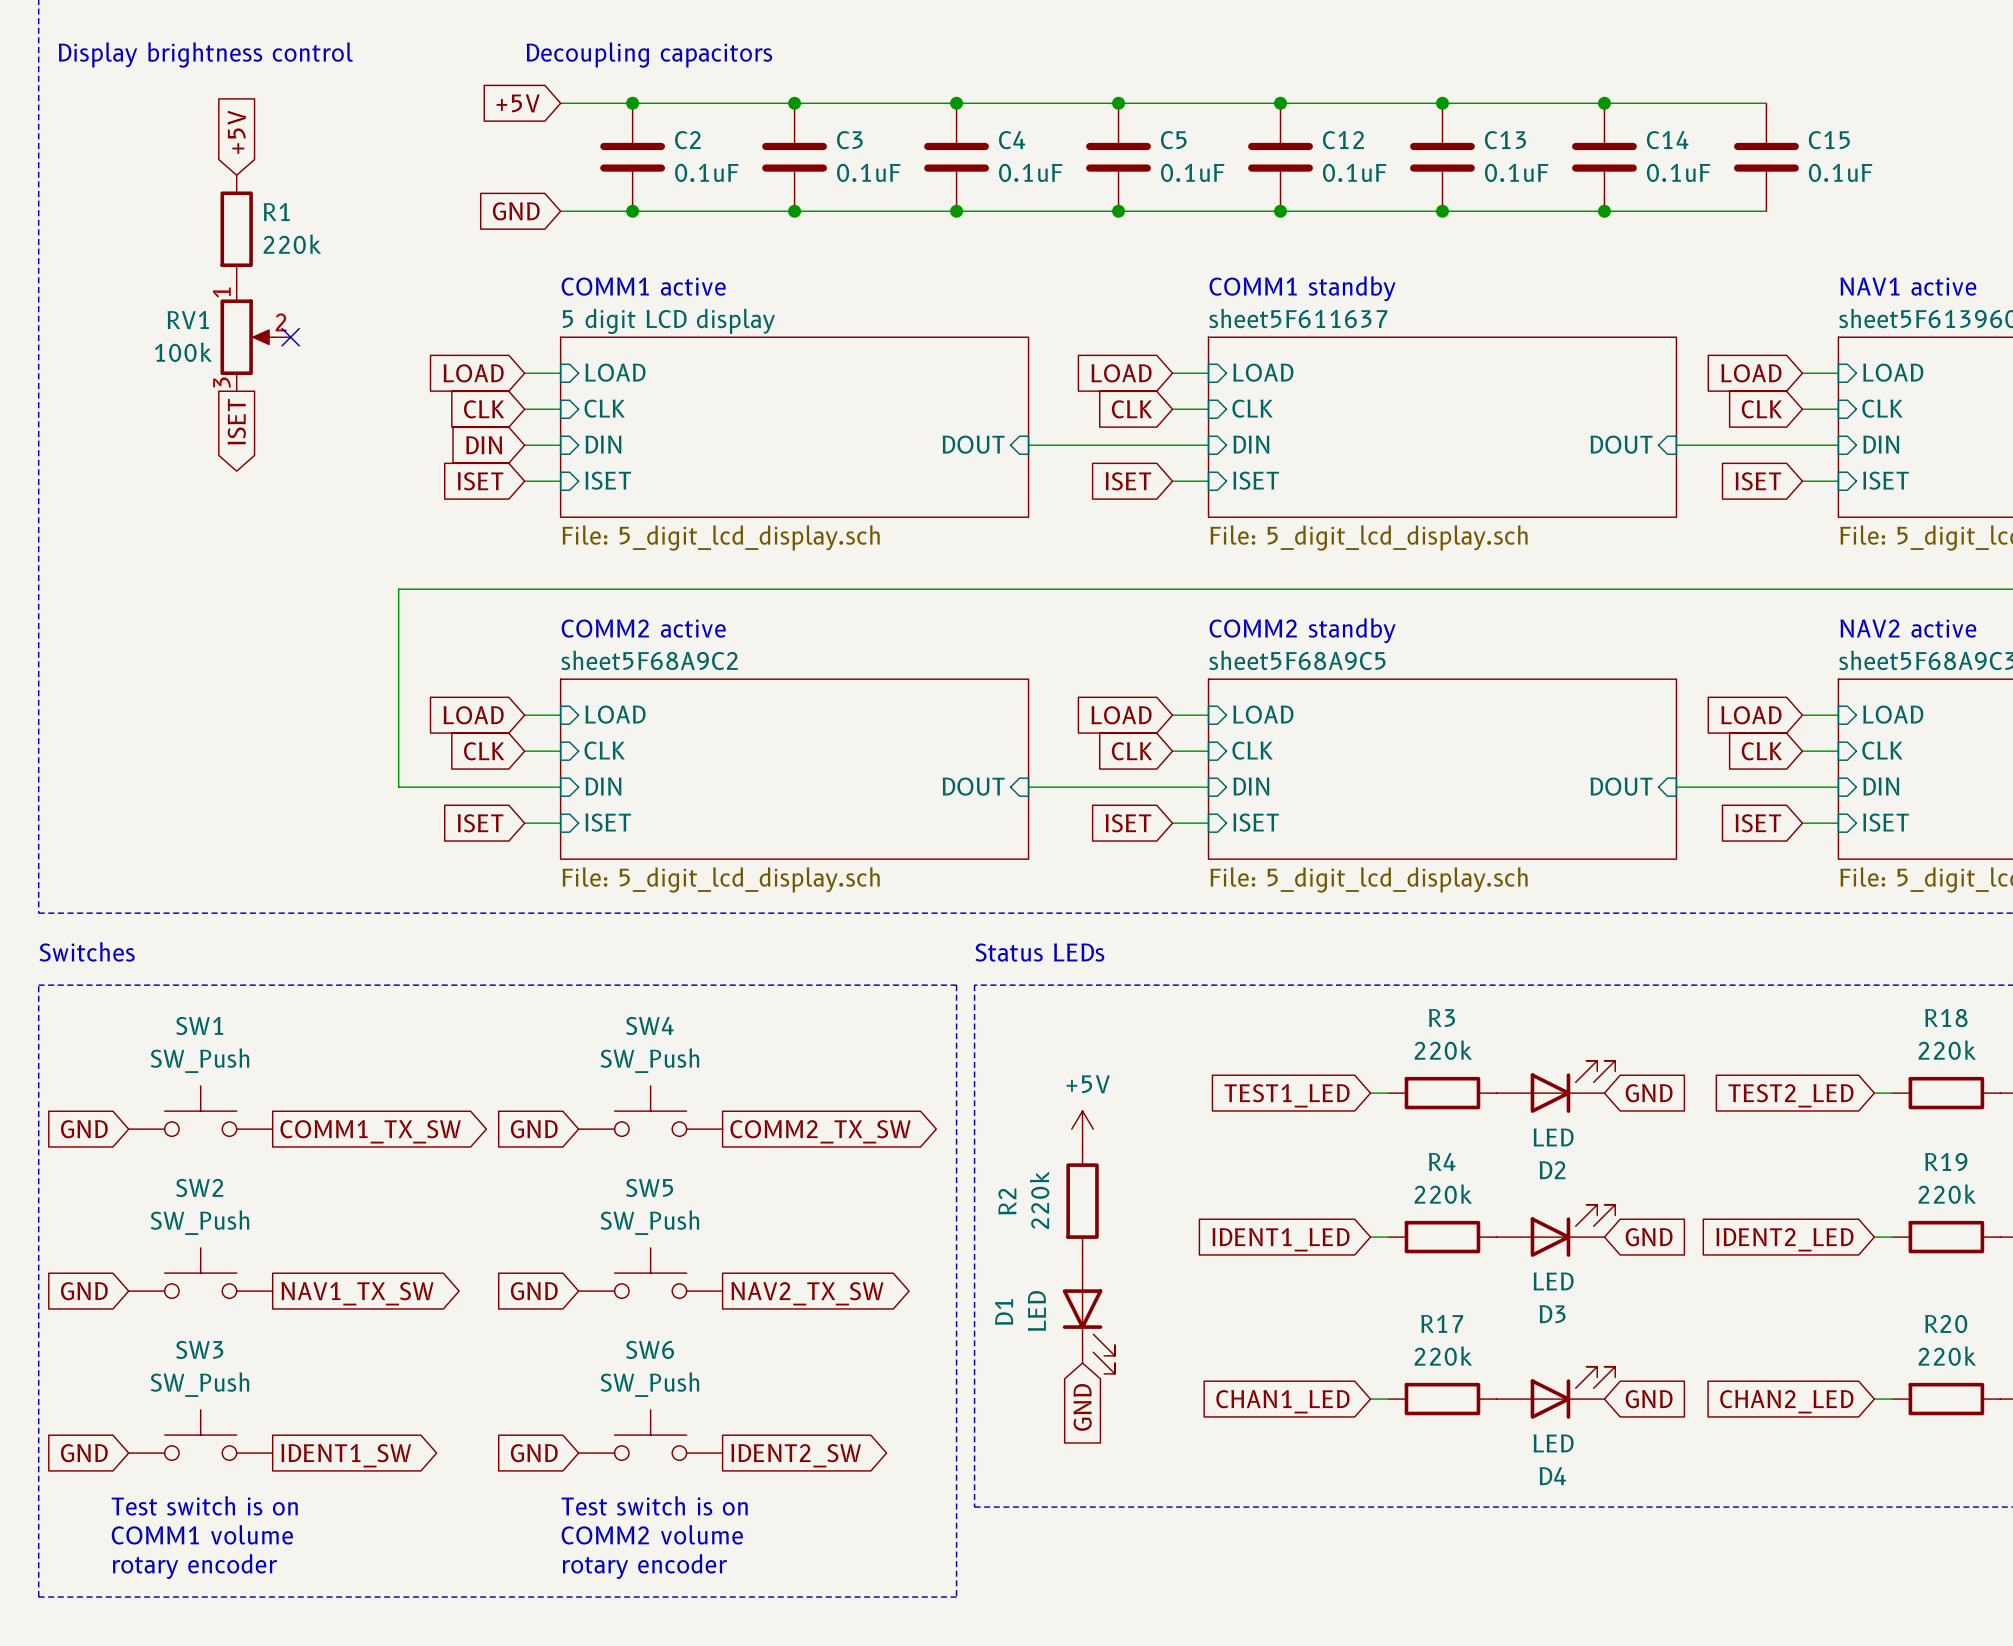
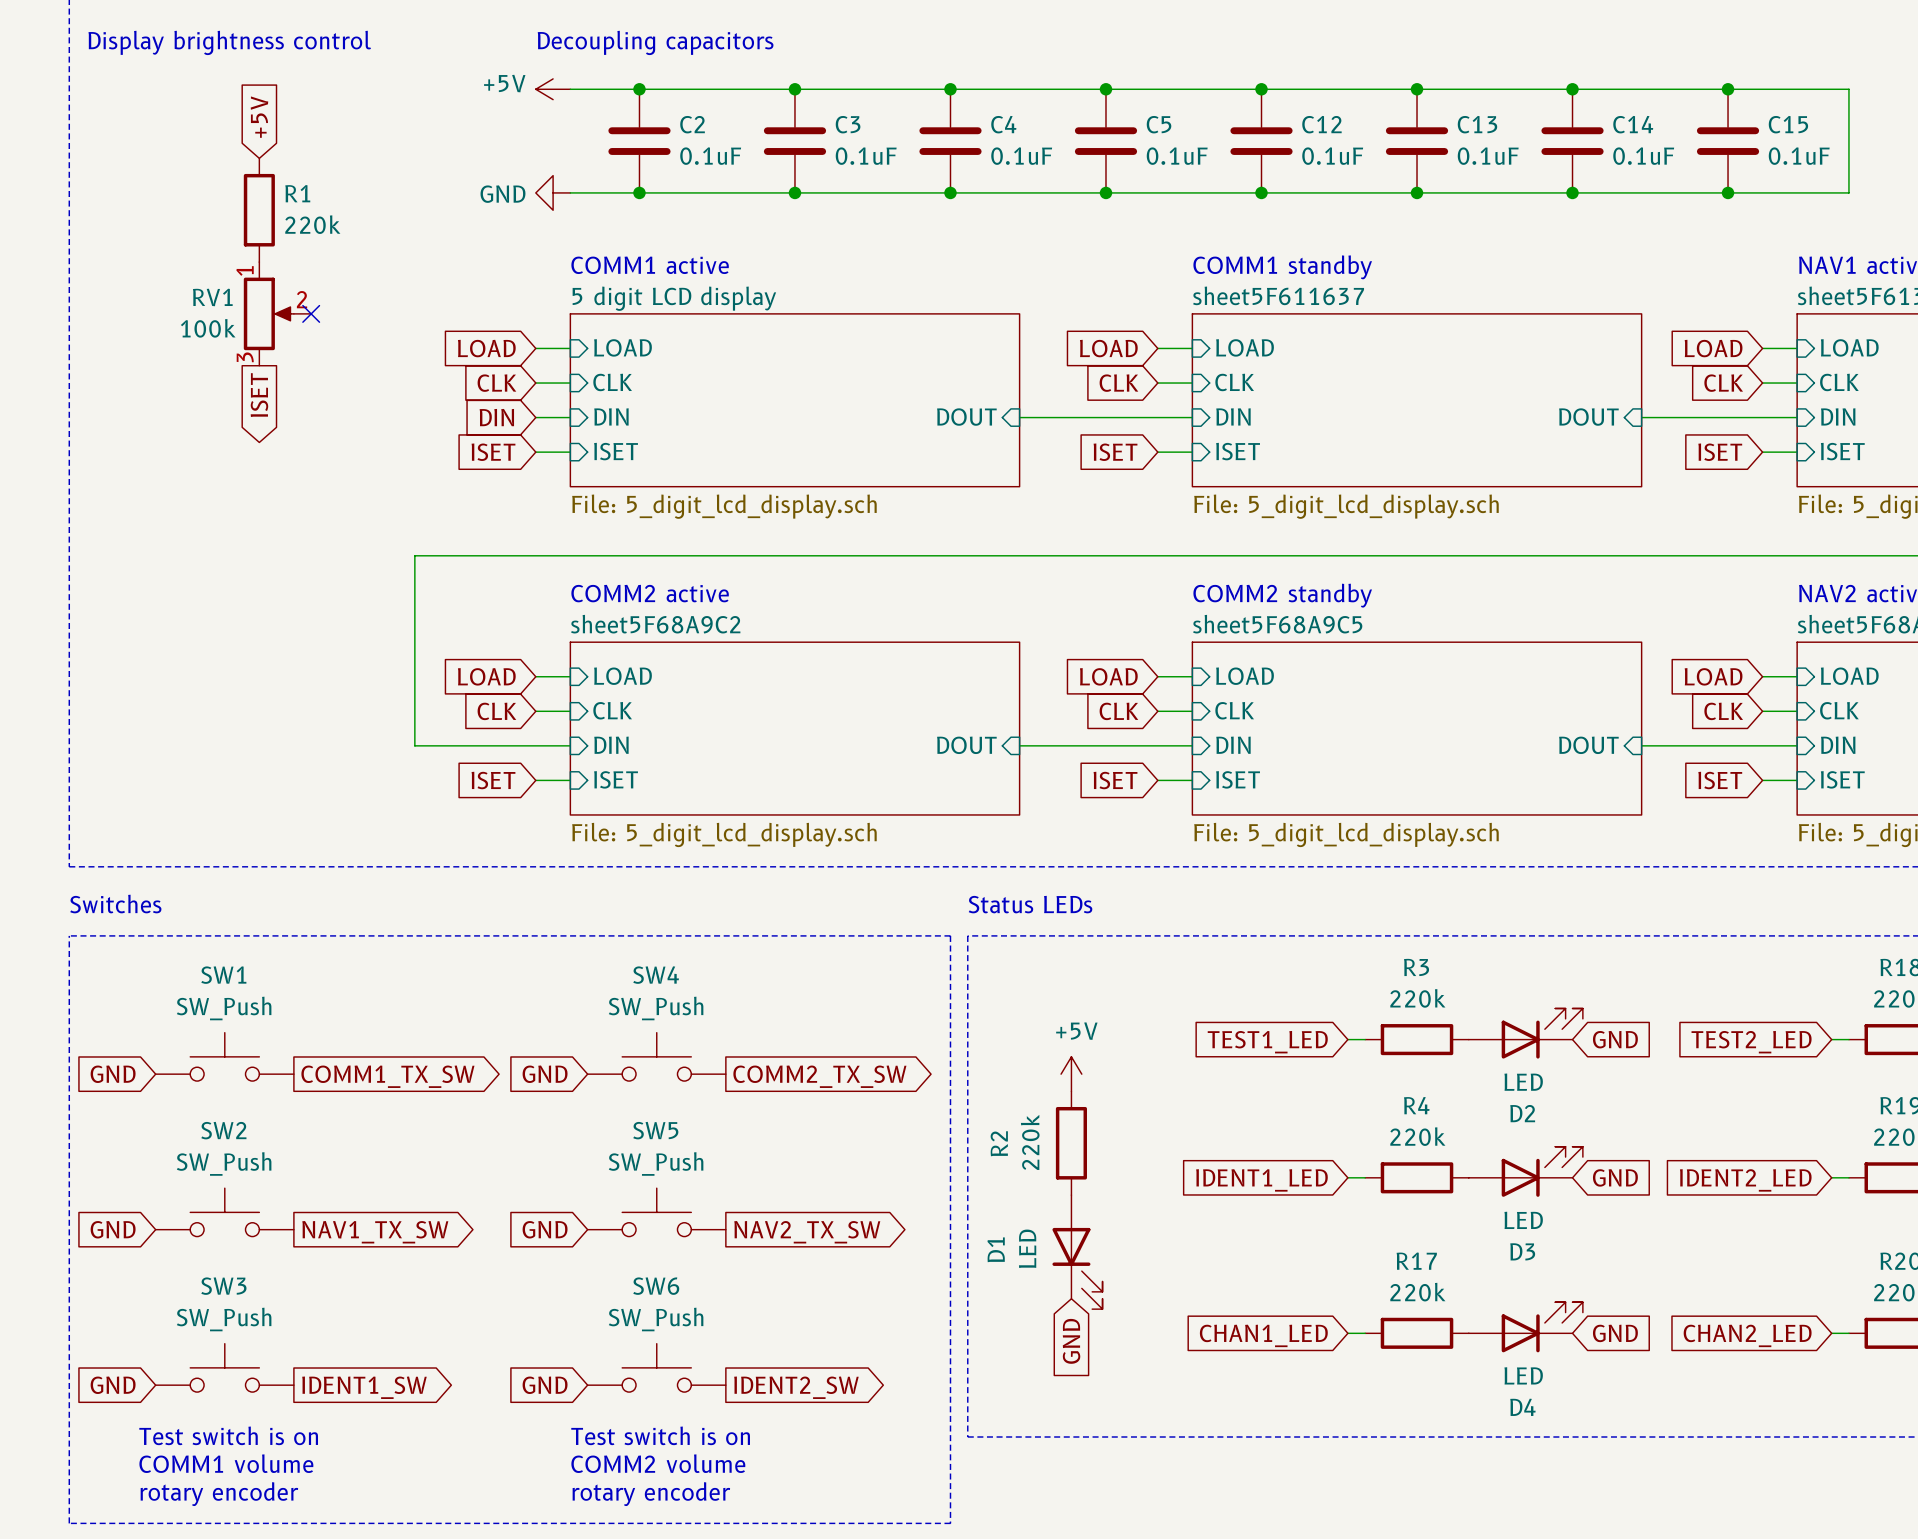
global label: +5V (518, 103) -> none
power symbol: none -> +5V (553, 89)
wire: none -> (1728, 89) (1848, 89) (1848, 192) (1728, 192)
junction: none -> (1728, 89)
global label: GND (516, 211) -> none
power symbol: none -> GND (553, 192)
junction: none -> (1728, 192)

